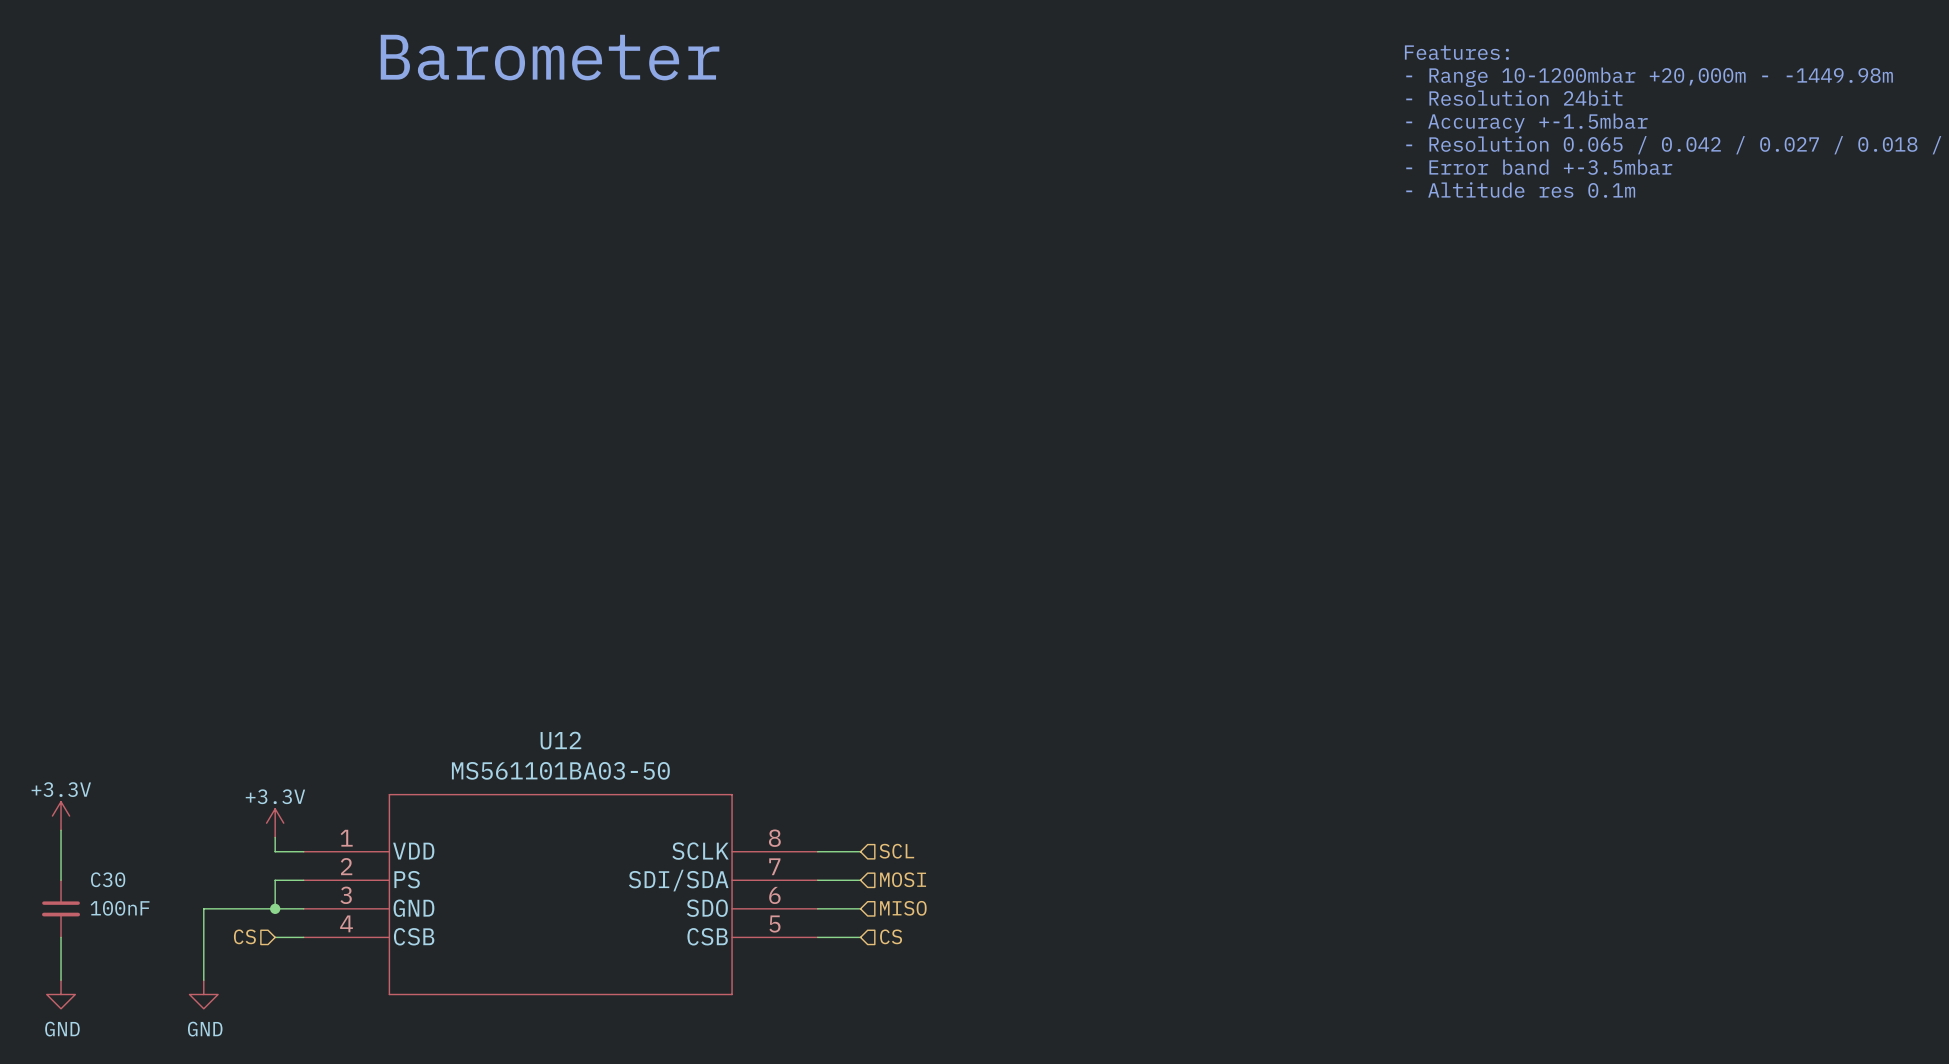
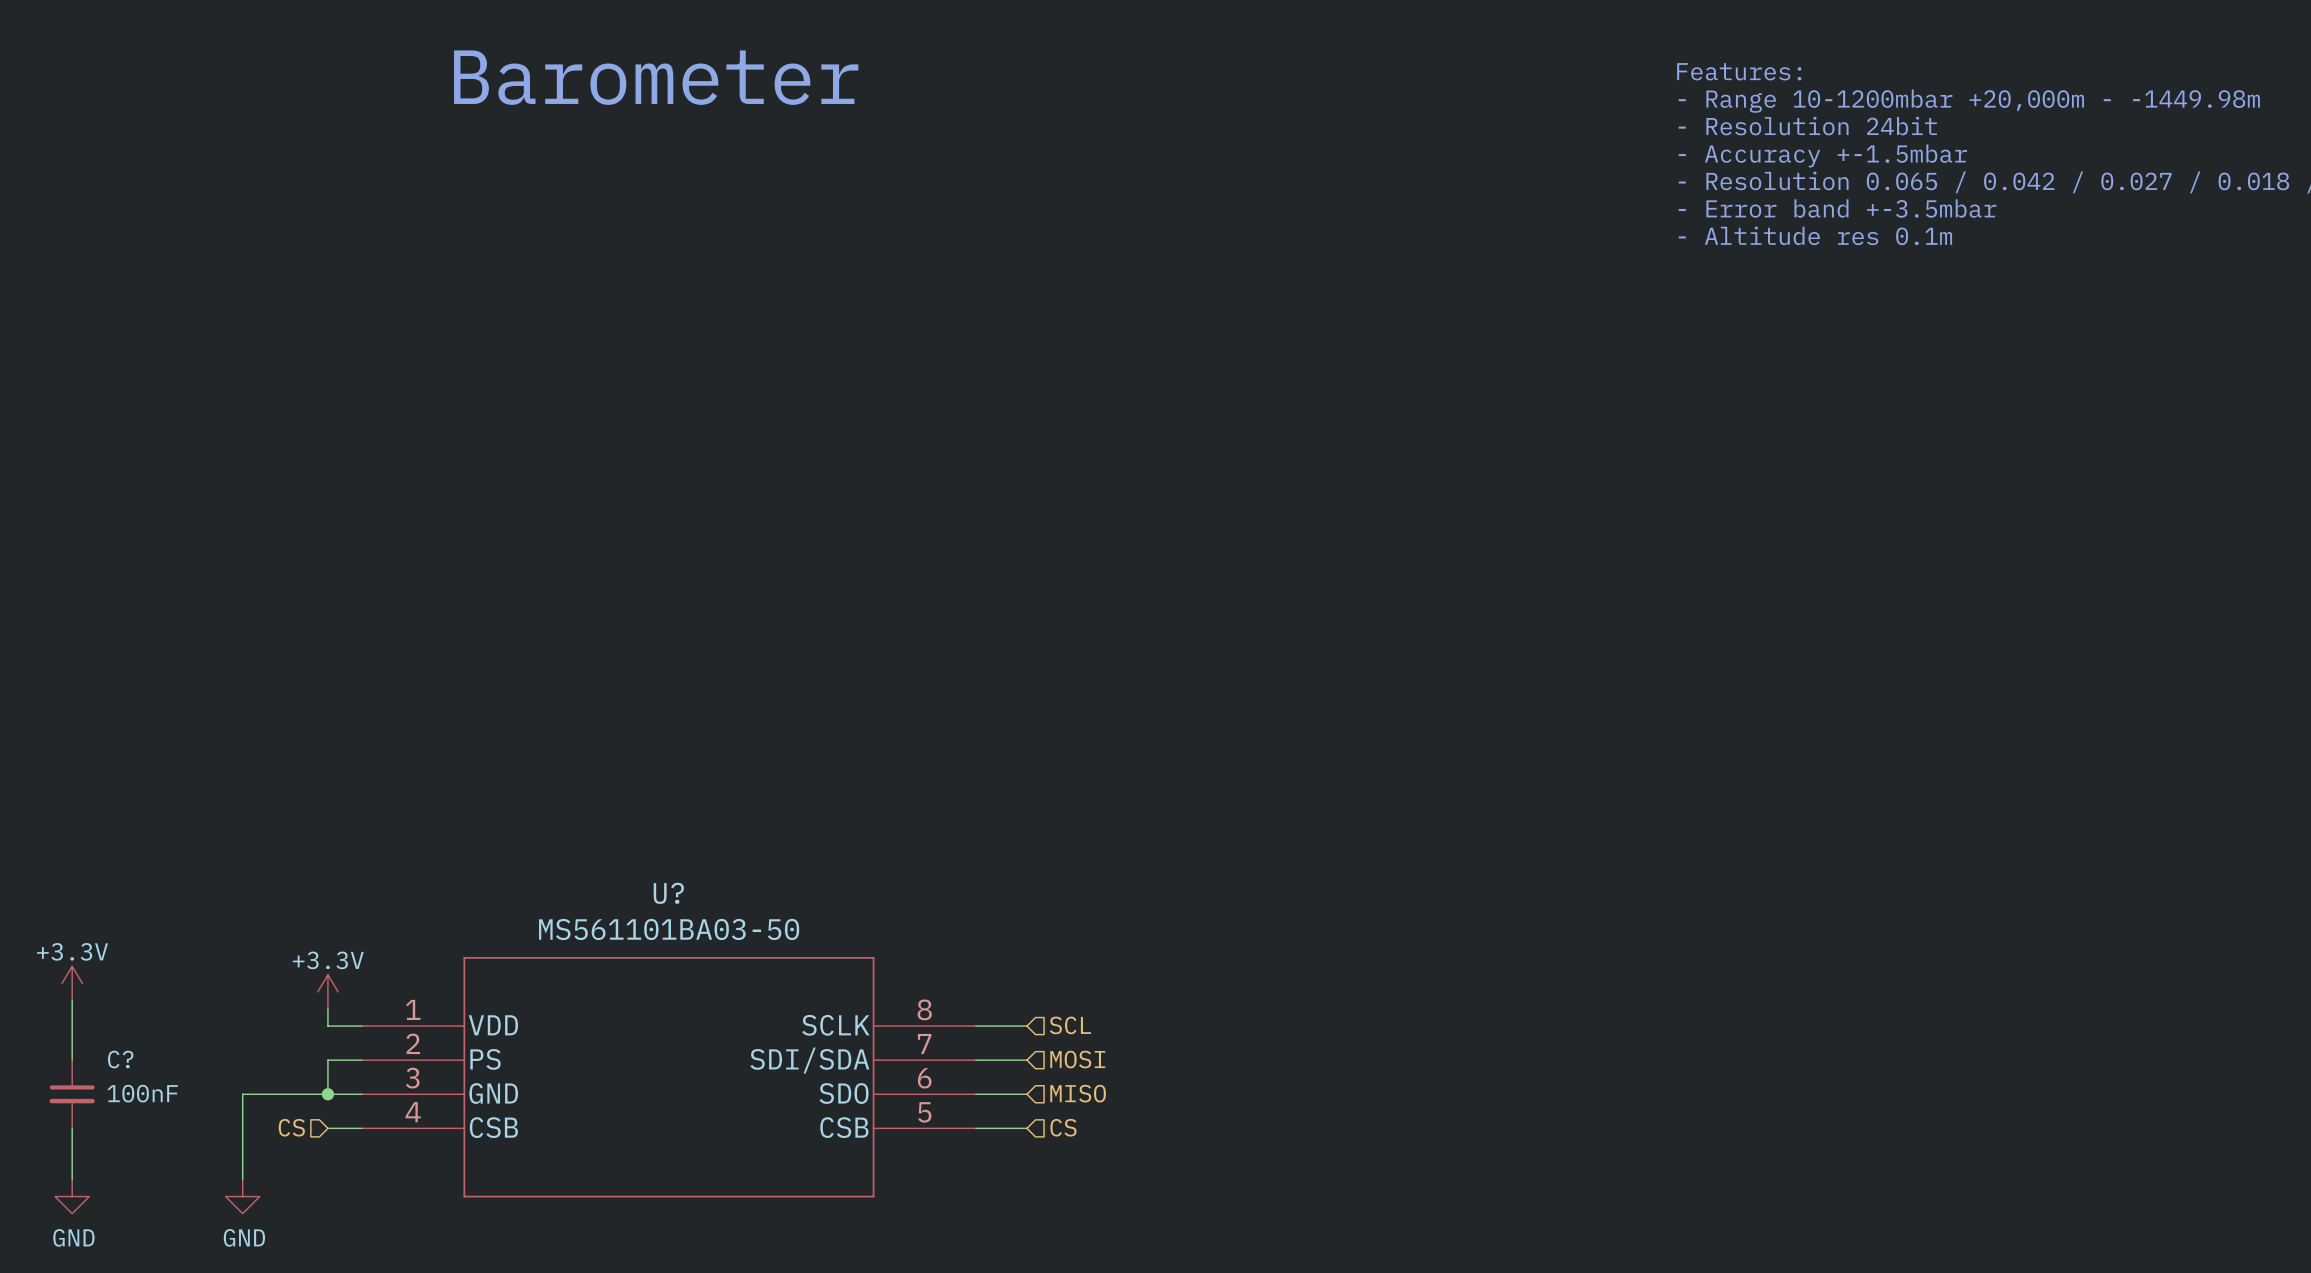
U12 name: U12 (560, 740) -> U? (668, 893)
C30 name: C30 (108, 879) -> C? (120, 1059)

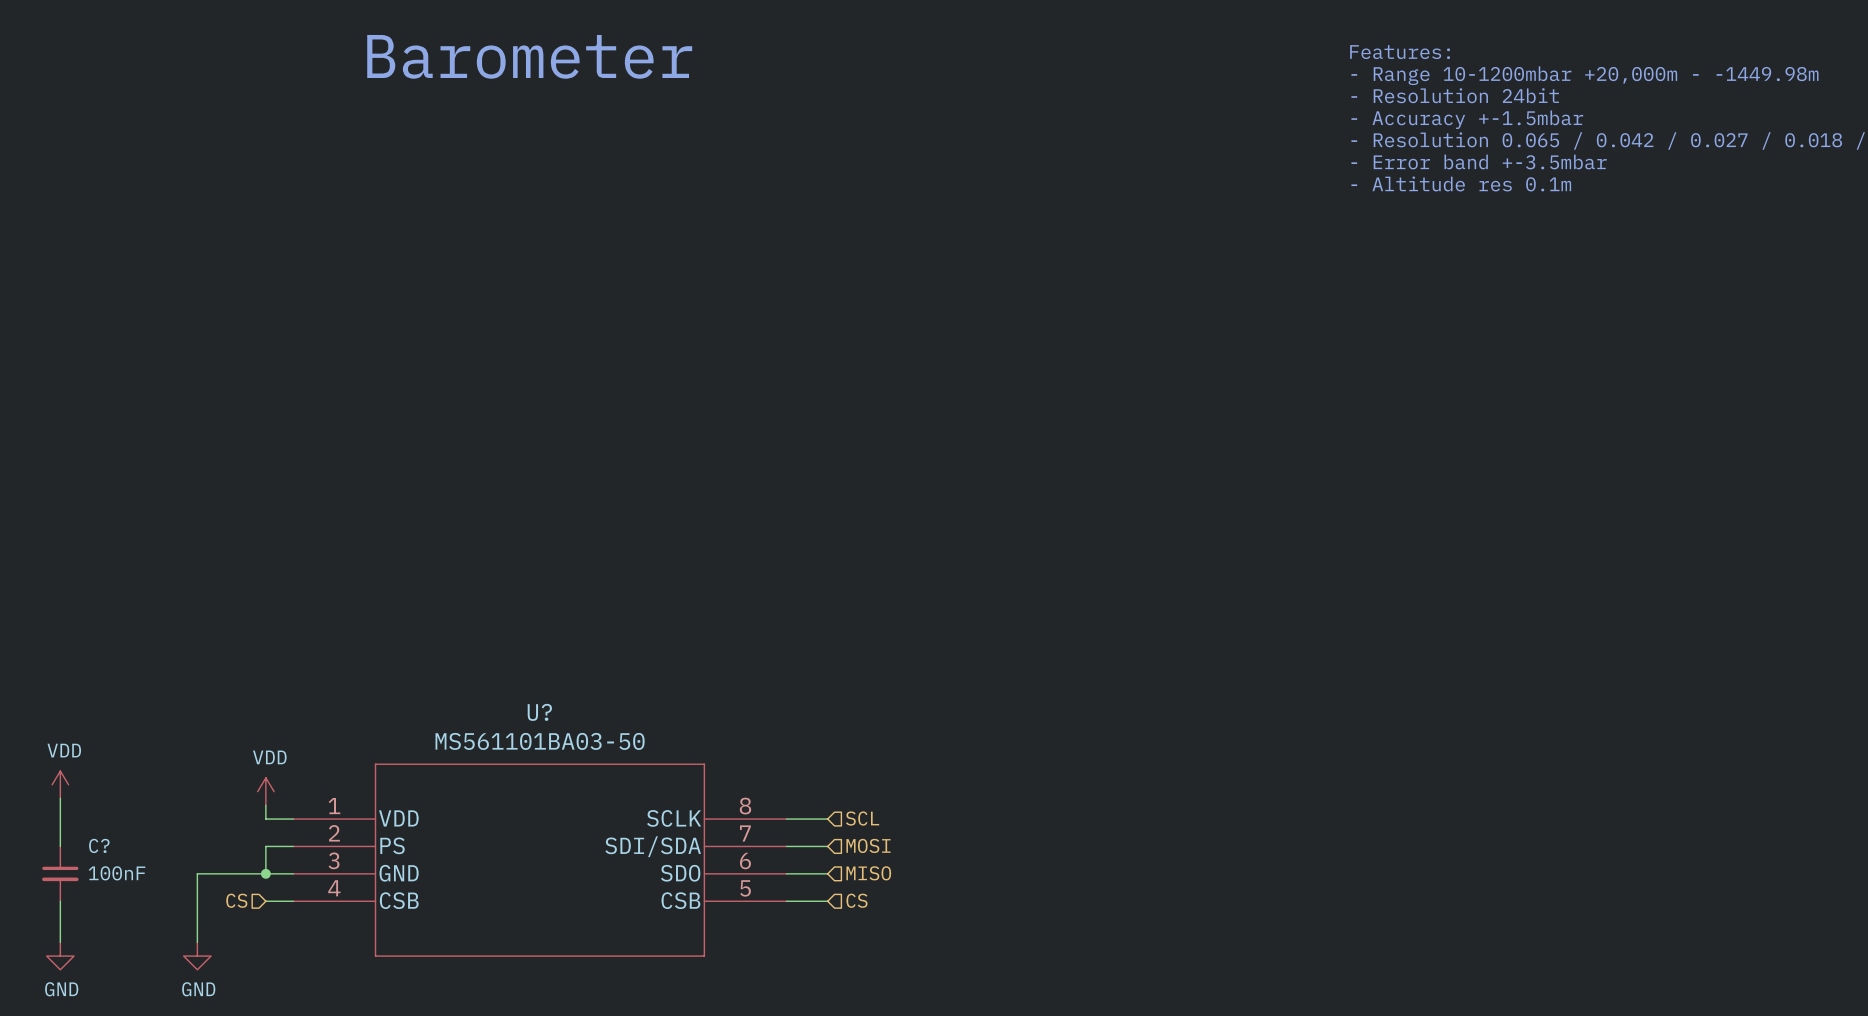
power symbol: +3.3V (72, 983) -> VDD (60, 784)
power symbol: +3.3V (327, 991) -> VDD (265, 791)

